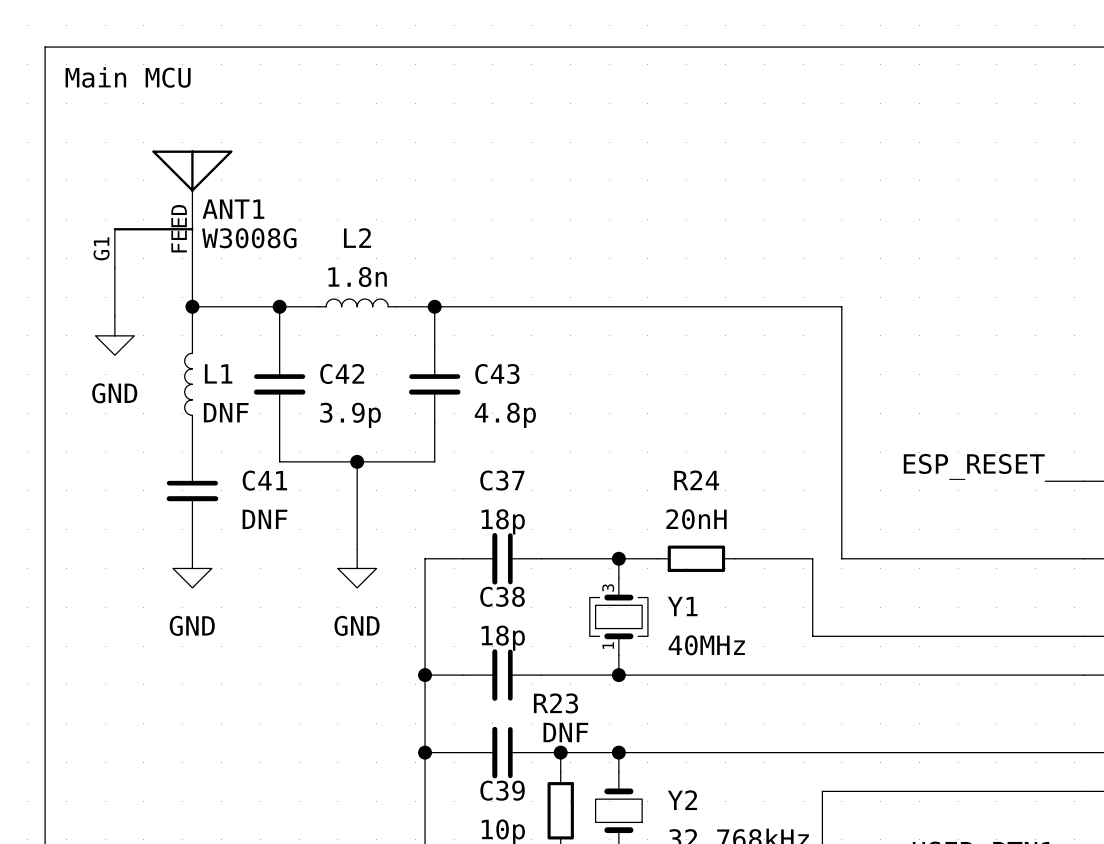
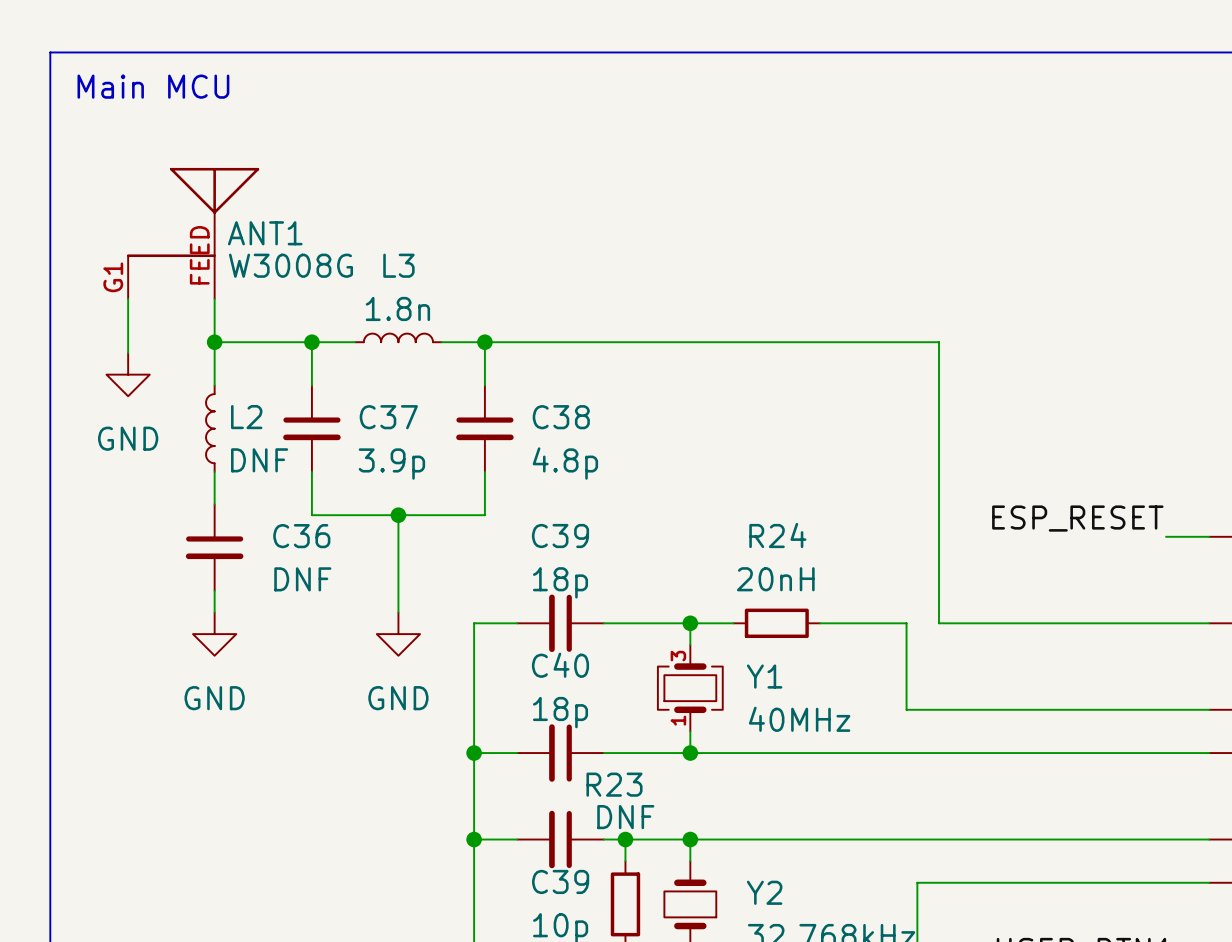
L2 name: L2 (357, 238) -> L3 (398, 265)
L1 name: L1 (218, 373) -> L2 (246, 417)
C42 name: C42 (342, 374) -> C37 (388, 417)
C43 name: C43 (497, 374) -> C38 (561, 417)
C41 name: C41 (264, 480) -> C36 (301, 536)
C37 name: C37 (502, 480) -> C39 (560, 536)
C38 name: C38 (502, 596) -> C40 (560, 665)

